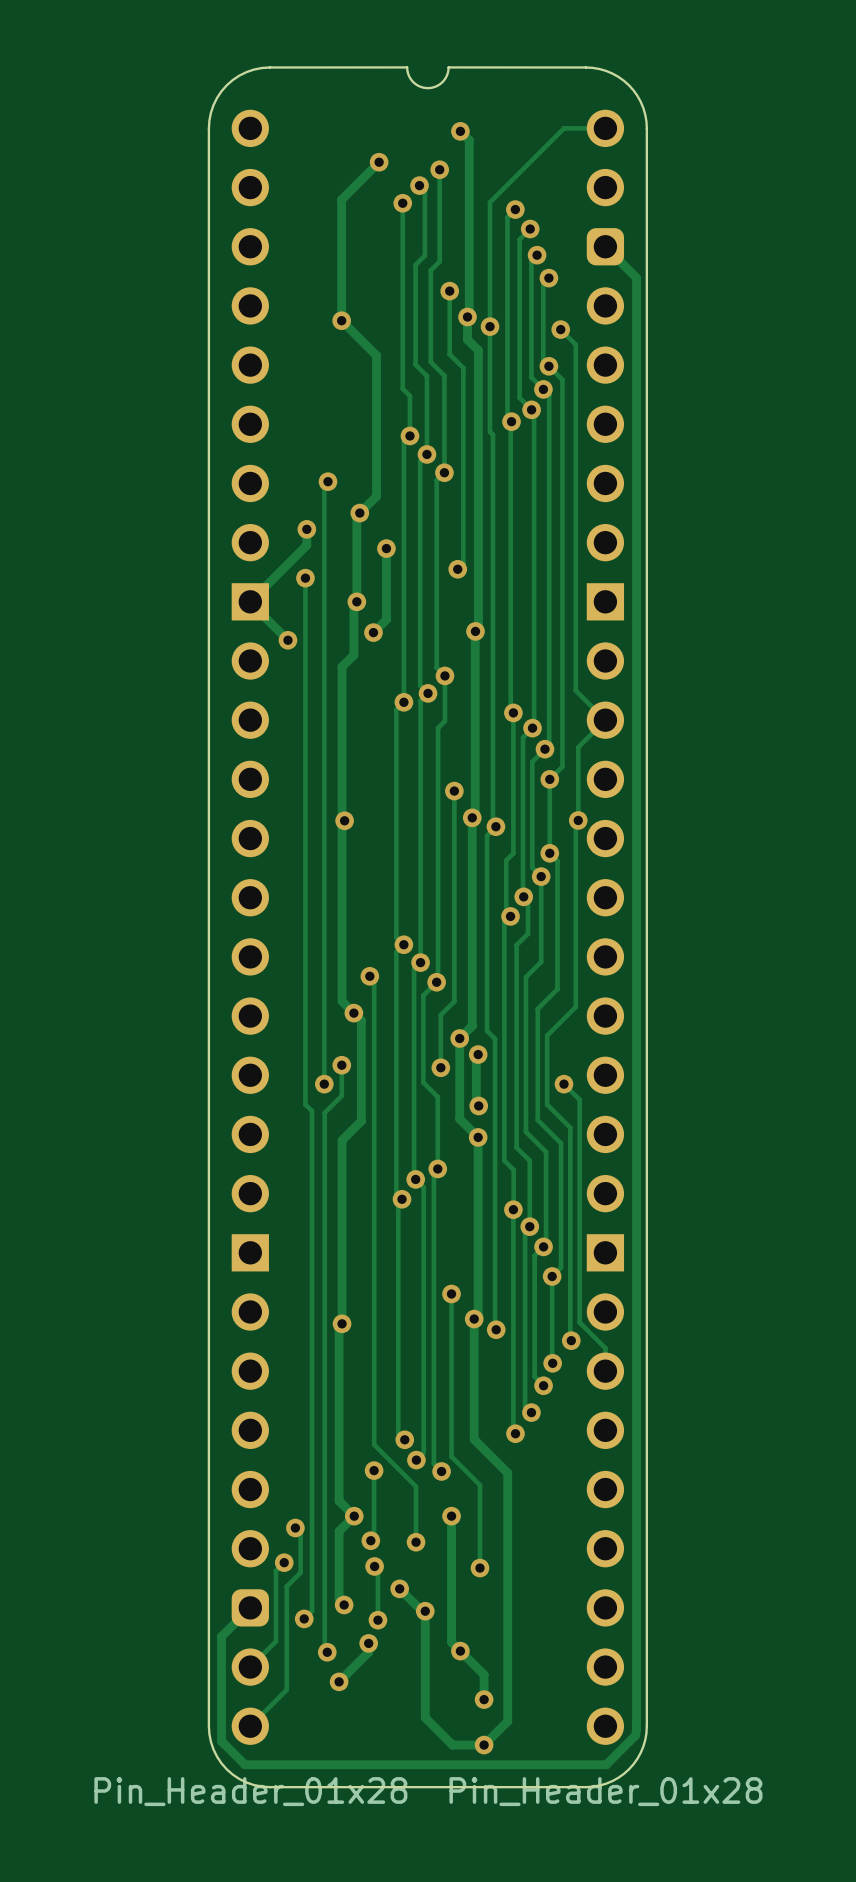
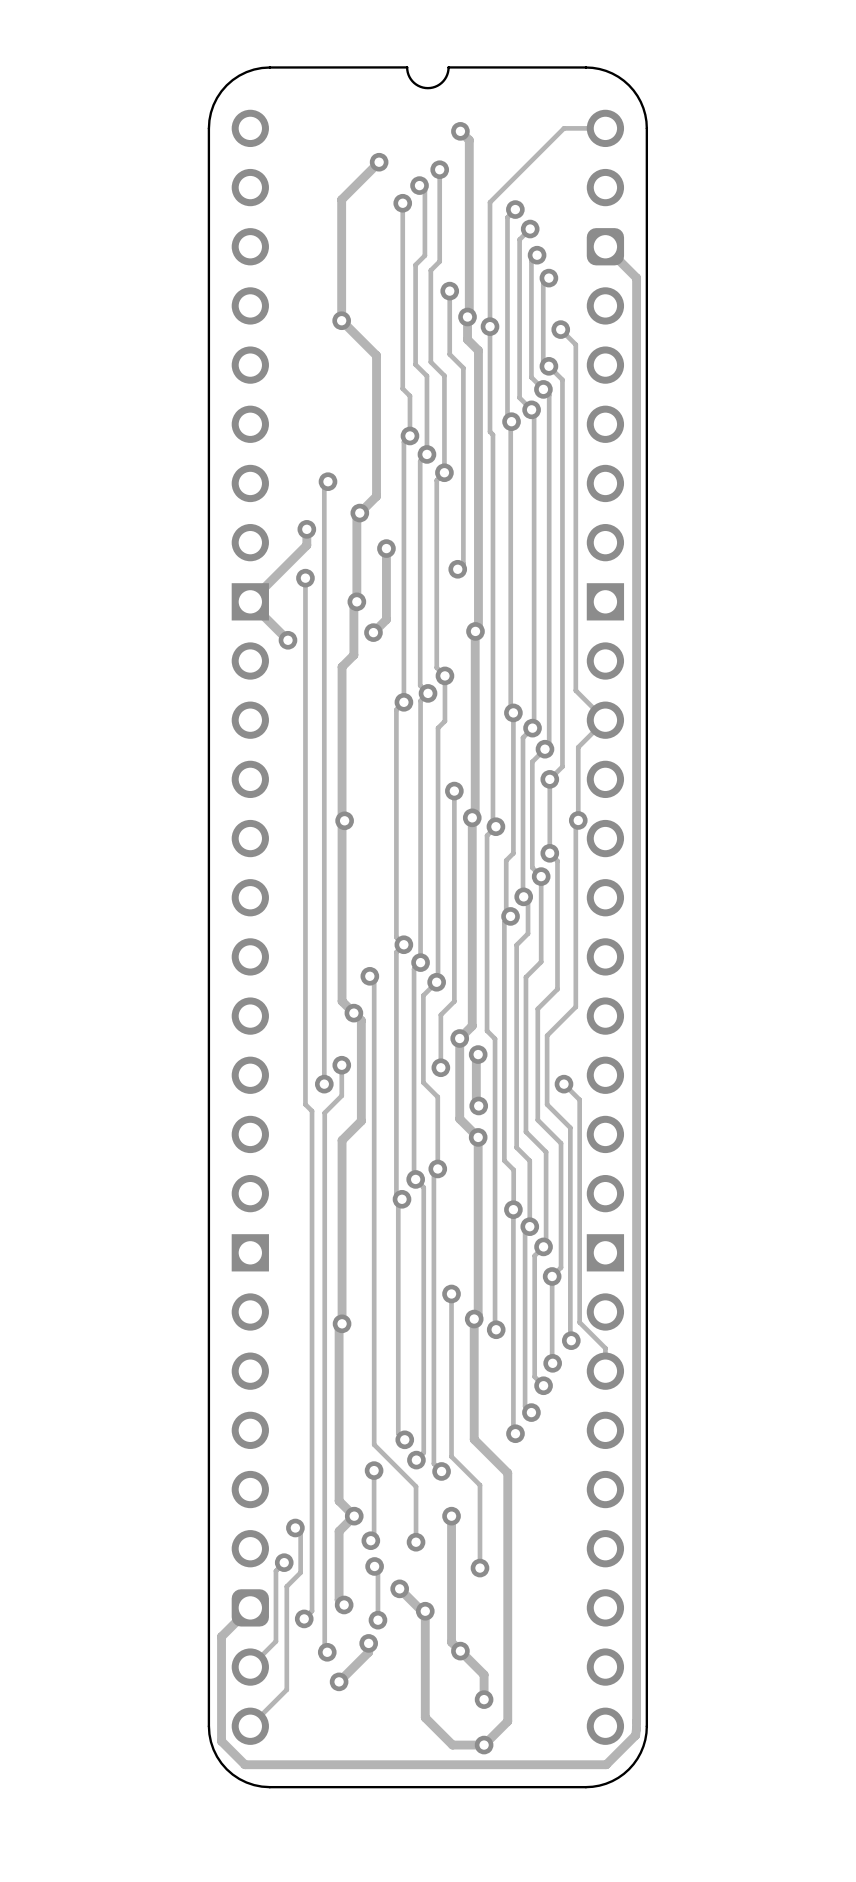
drawing: [94, 1777, 763, 1807] -> none

